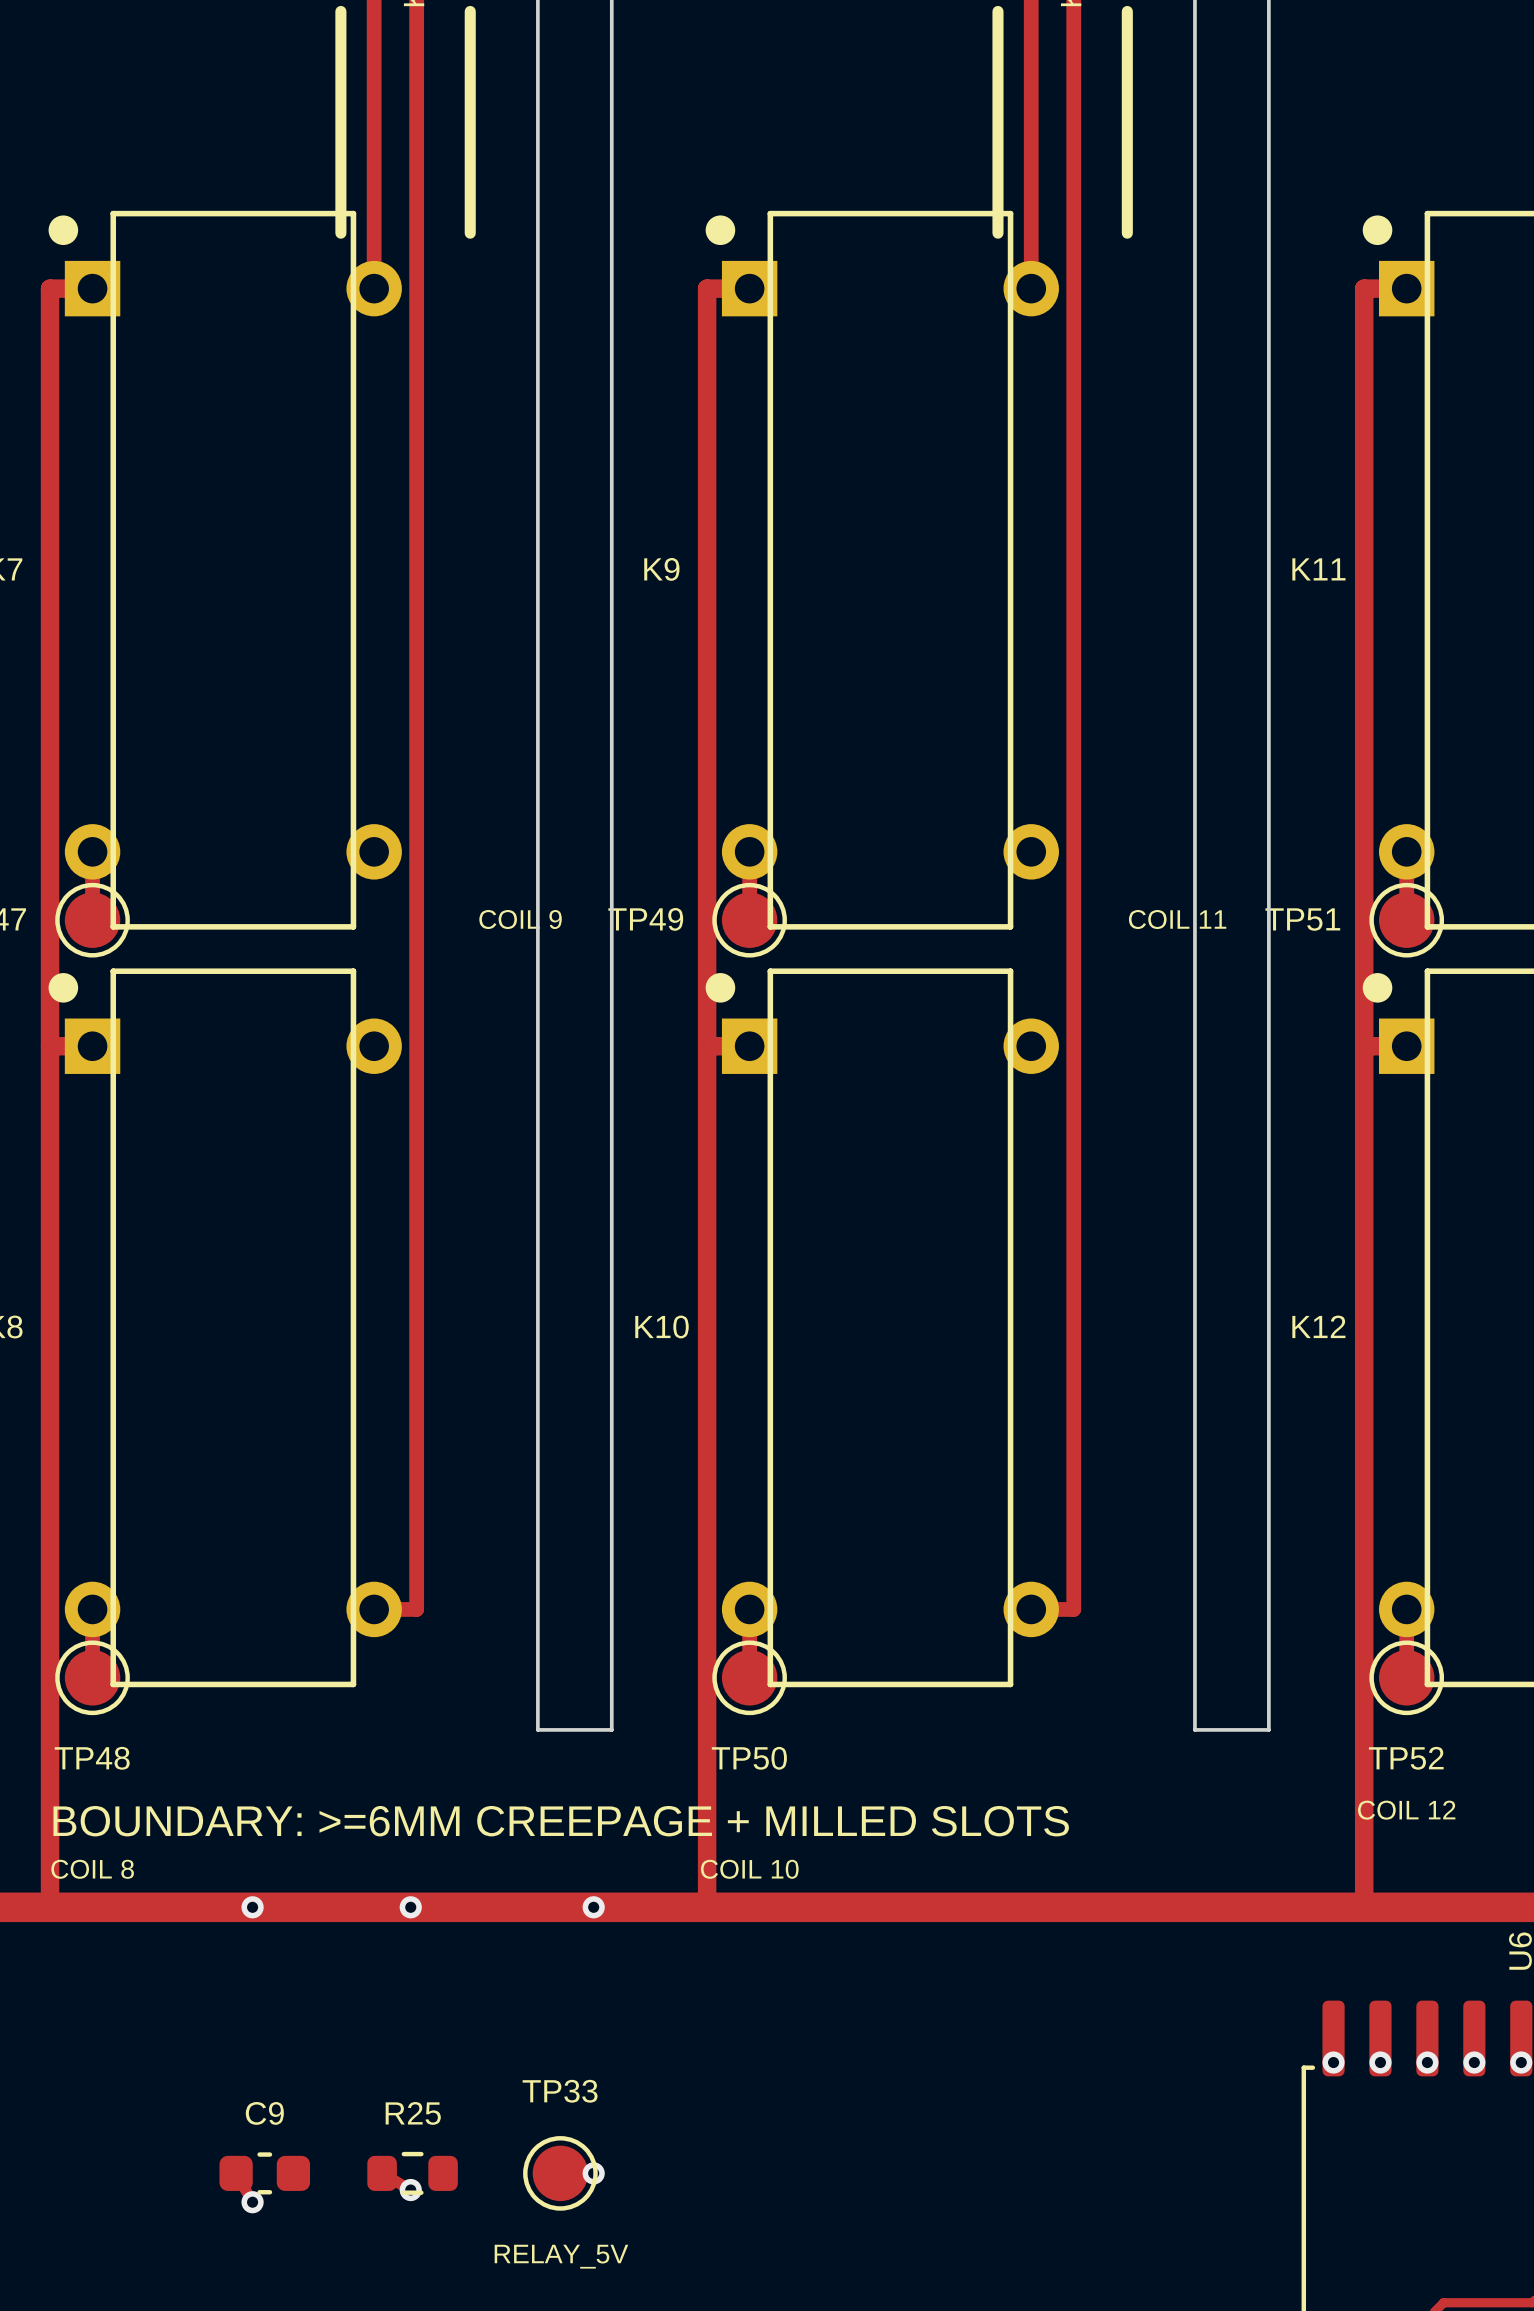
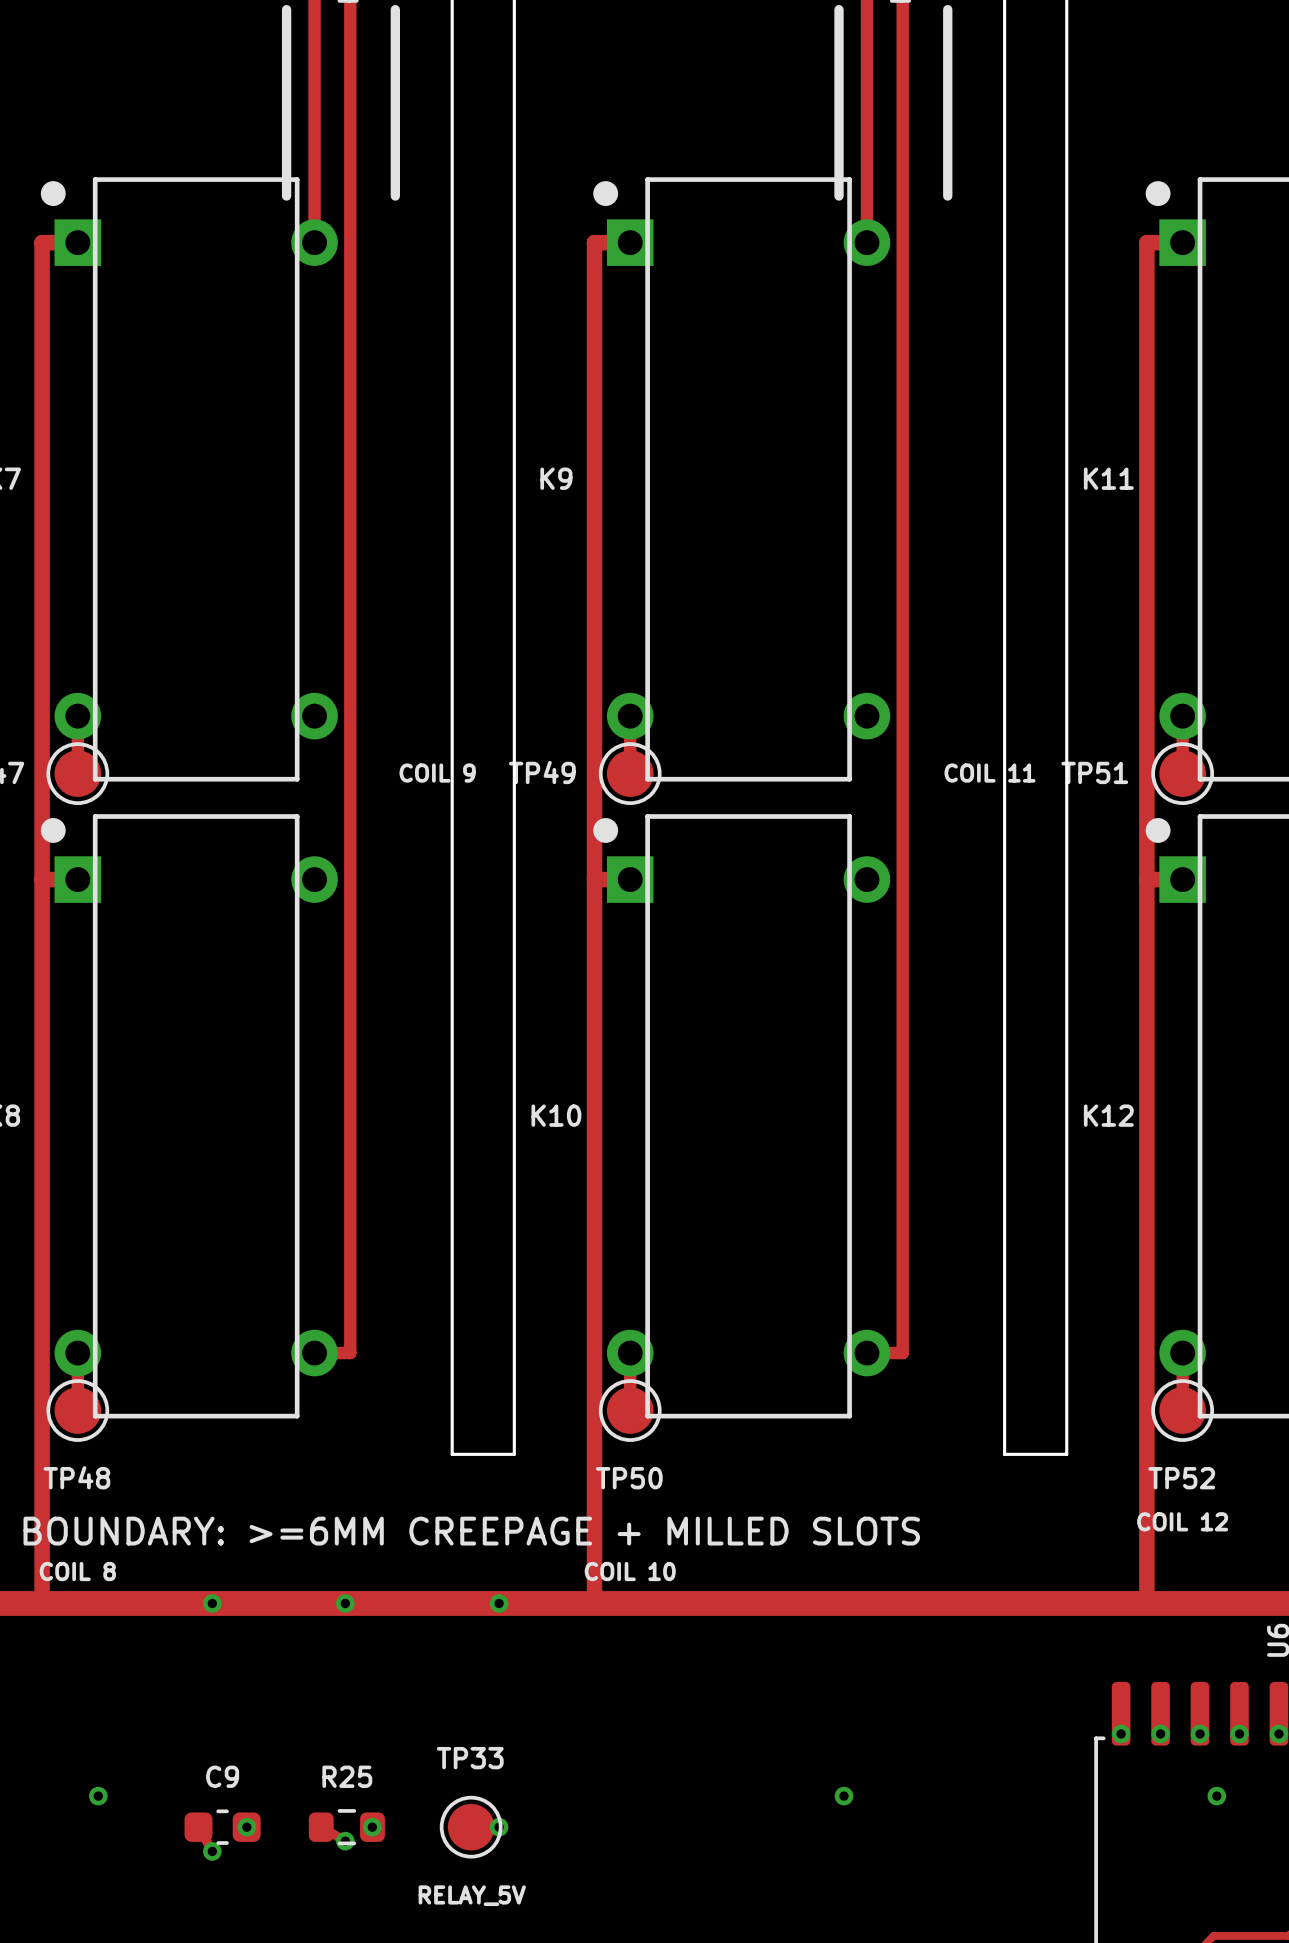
via: none -> (98, 1796)
via: none -> (843, 1796)
via: none -> (1216, 1796)
via: none -> (246, 1827)
via: none -> (372, 1827)

